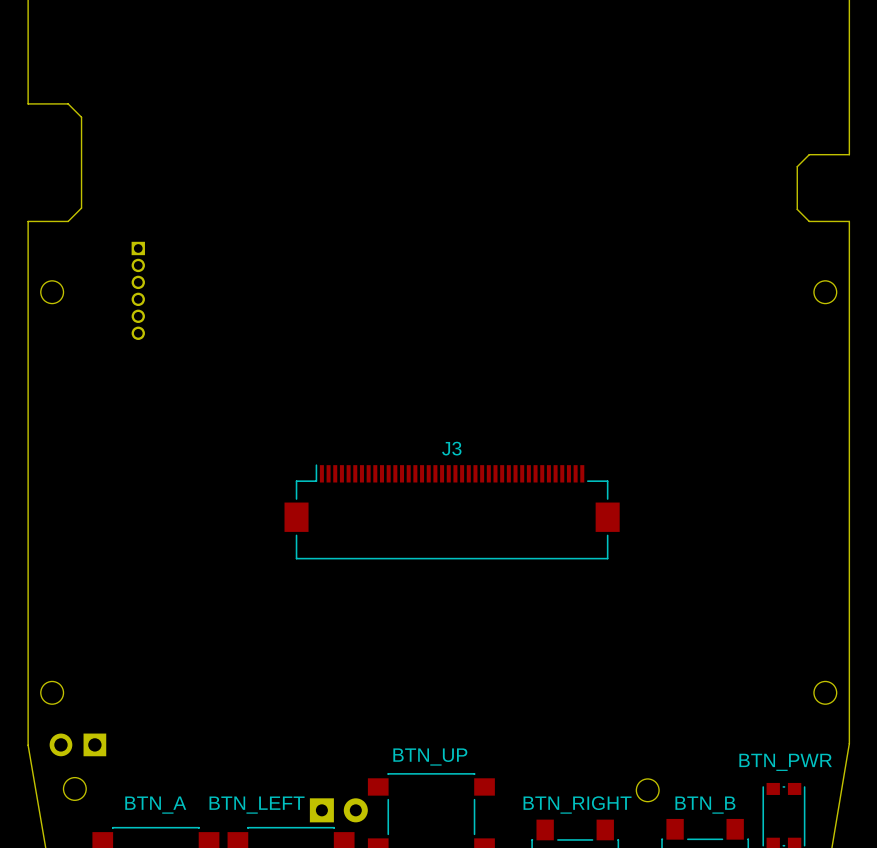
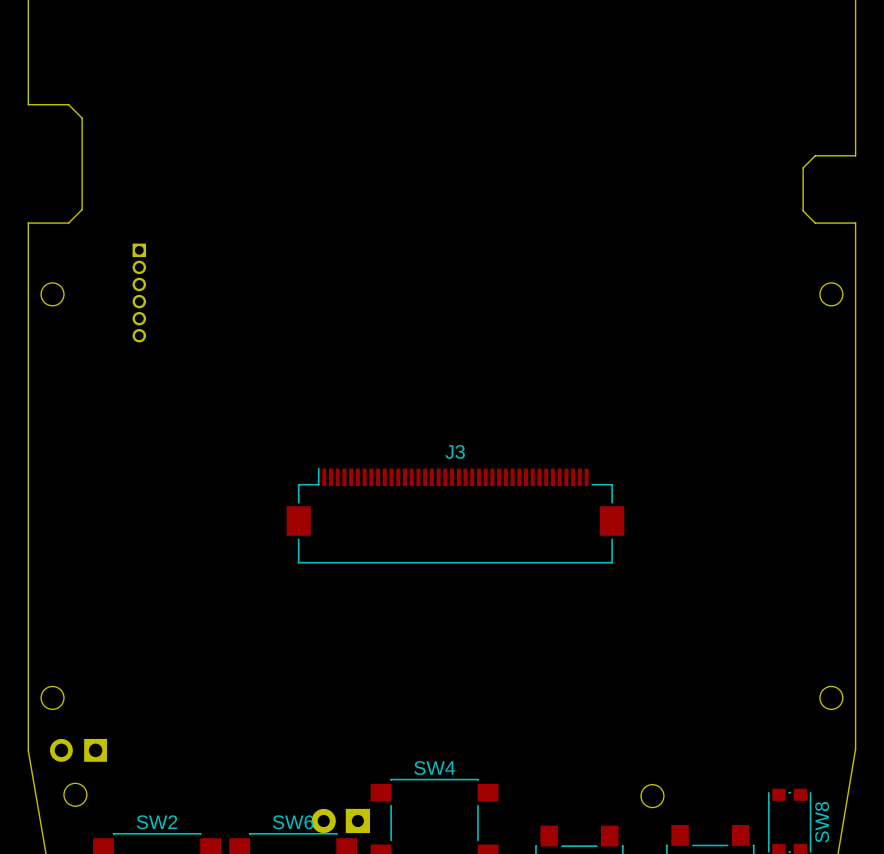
SW4 value: BTN_UP (430, 757) -> none
SW4 name: none -> SW4 (434, 768)
SW8 value: BTN_PWR (785, 762) -> none
part value: BTN_RIGHT (577, 804) -> none
SW2 value: BTN_A (155, 805) -> none
SW6 value: BTN_LEFT (257, 805) -> none
part value: BTN_B (705, 805) -> none
part rotation: 0° (338, 810) -> 180° (340, 820)
SW2 name: none -> SW2 (157, 822)
SW6 name: none -> SW6 (293, 822)
SW8 name: none -> SW8 (822, 822)

